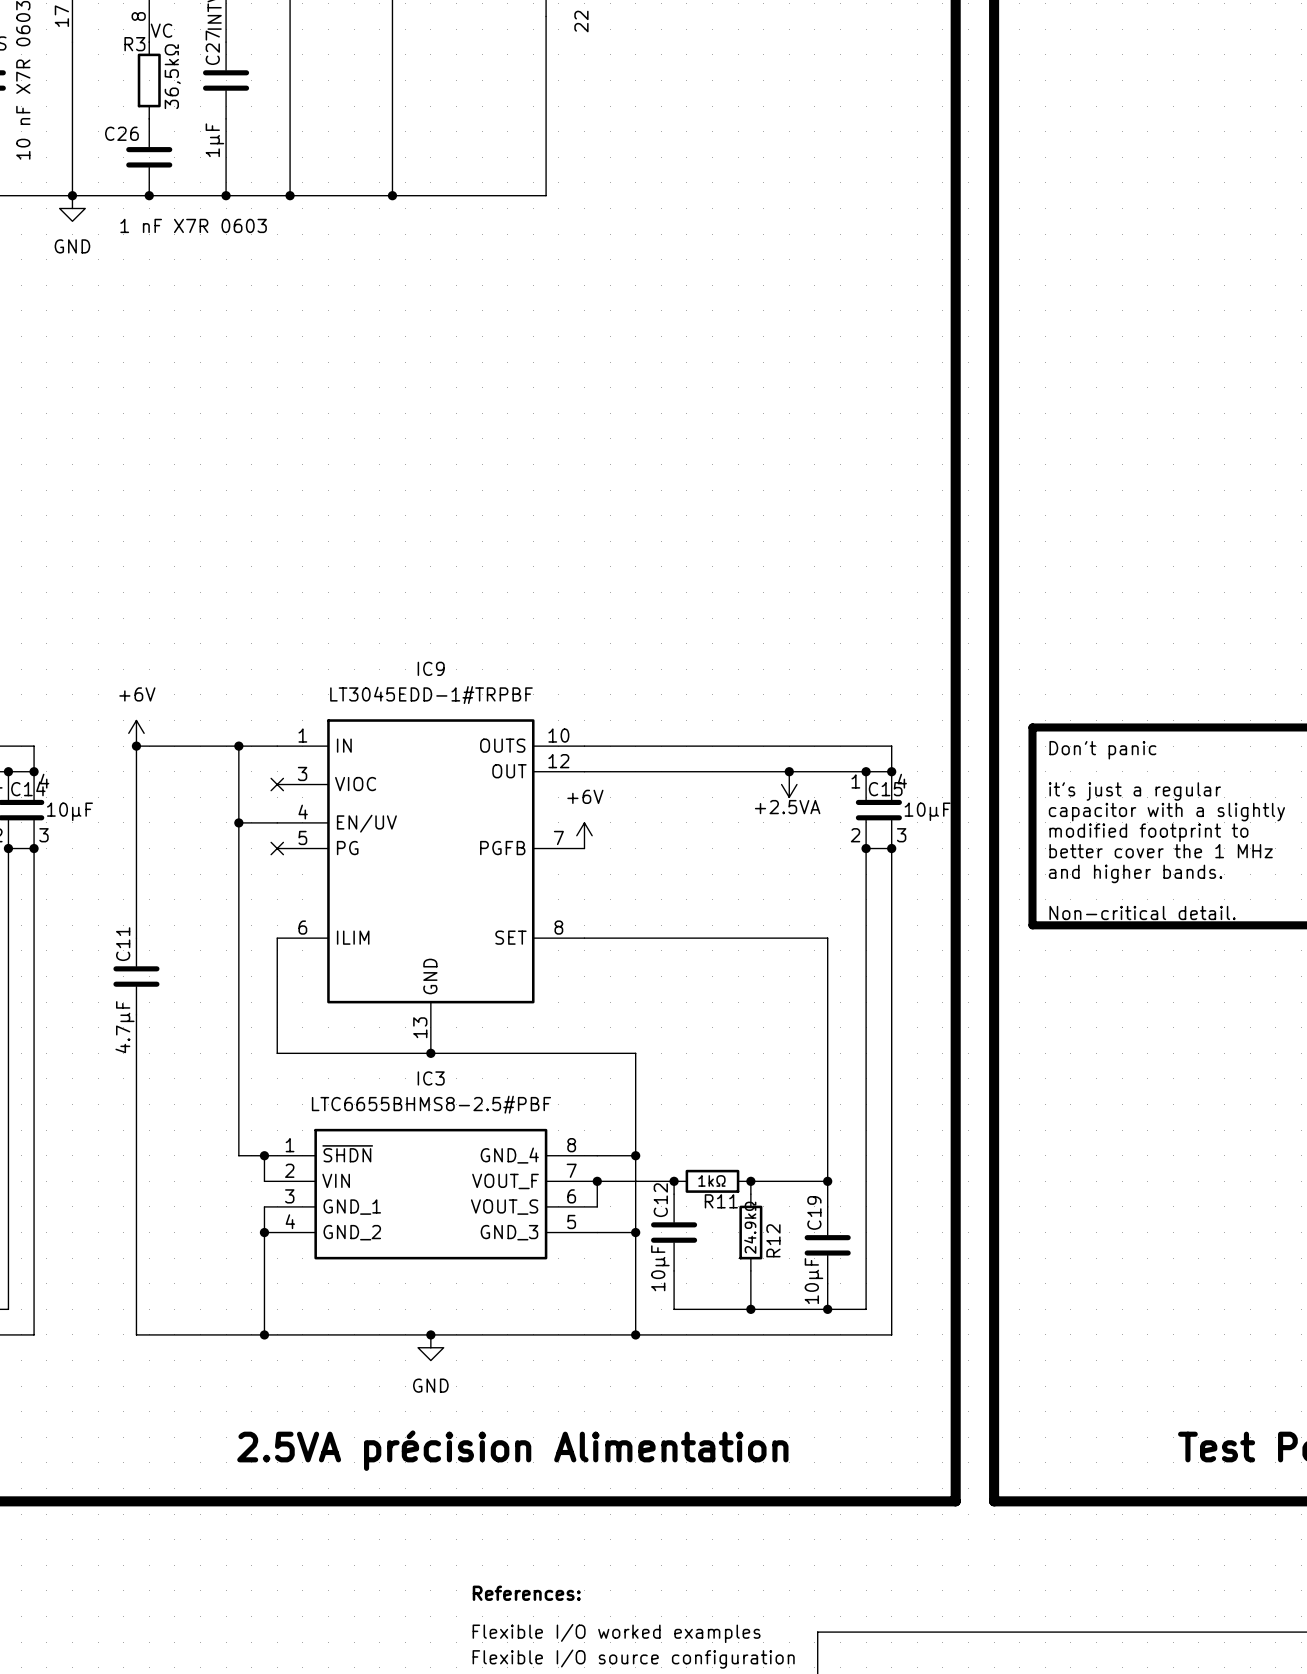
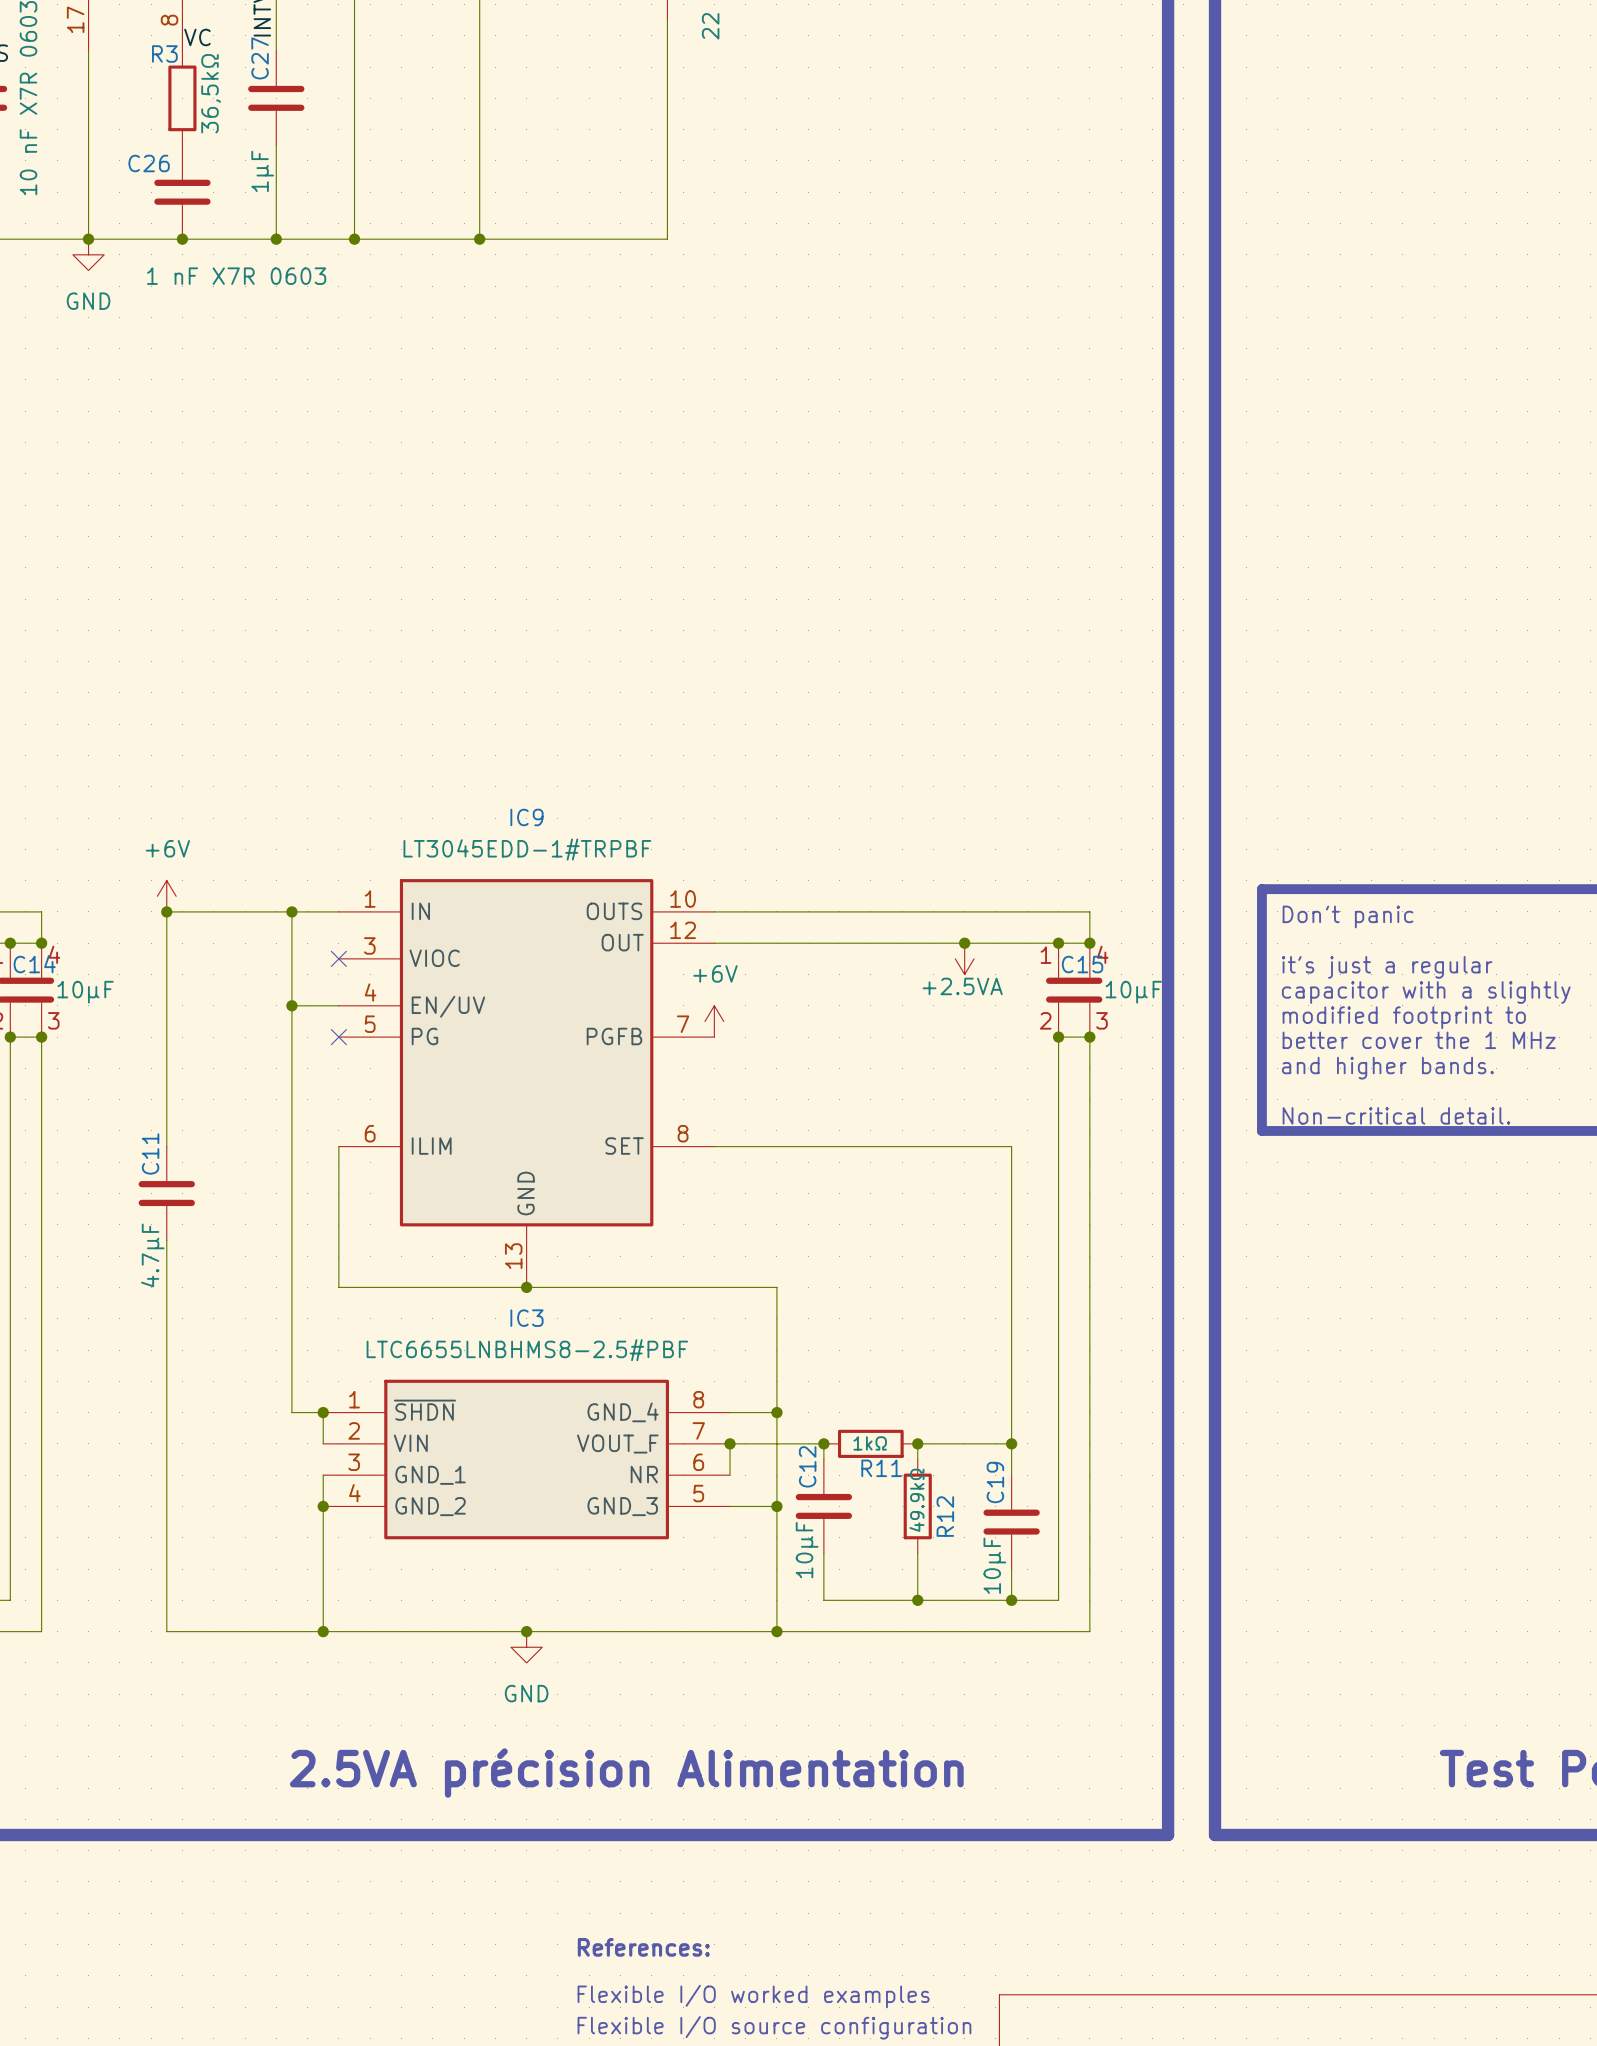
IC3 value: LTC6655BHMS8-2.5#PBF (431, 1104) -> LTC6655LNBHMS8-2.5#PBF (527, 1350)
IC3 pin name: VOUT_S (504, 1207) -> NR (644, 1474)
R12 value: 24.9kΩ (750, 1227) -> 49.9kΩ (916, 1500)

